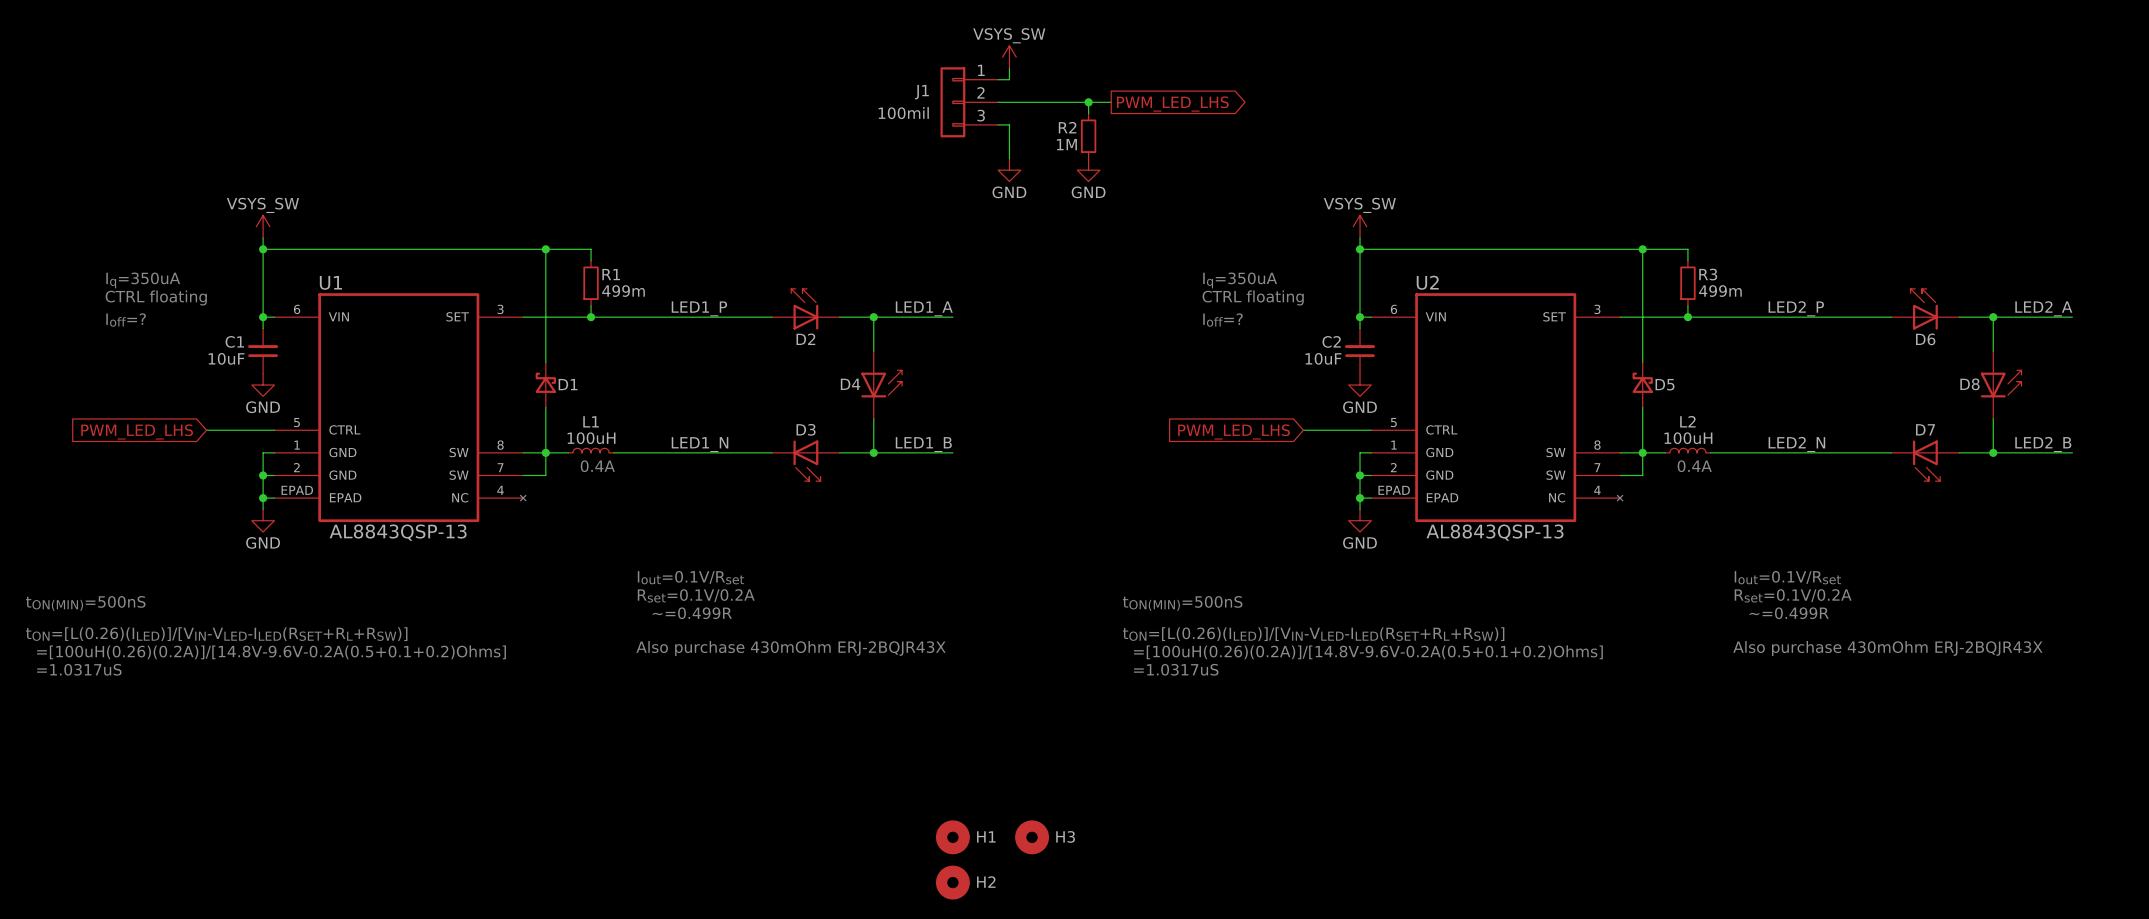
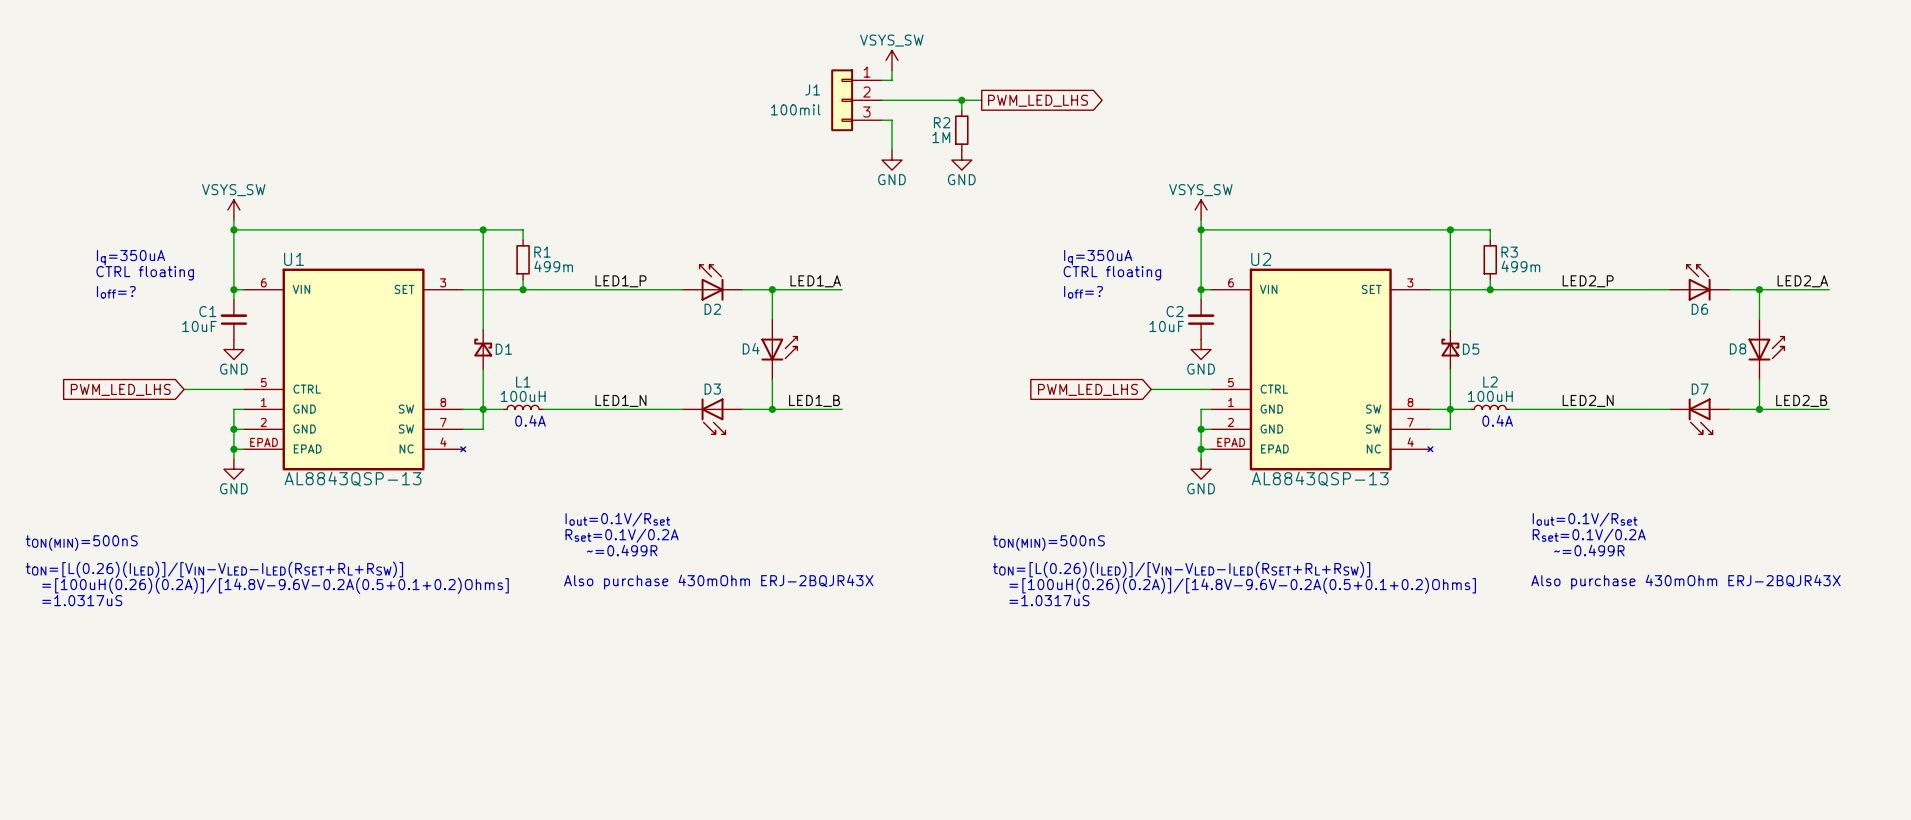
H1: (952, 837) -> none
H3: (1032, 837) -> none
H2: (952, 882) -> none

